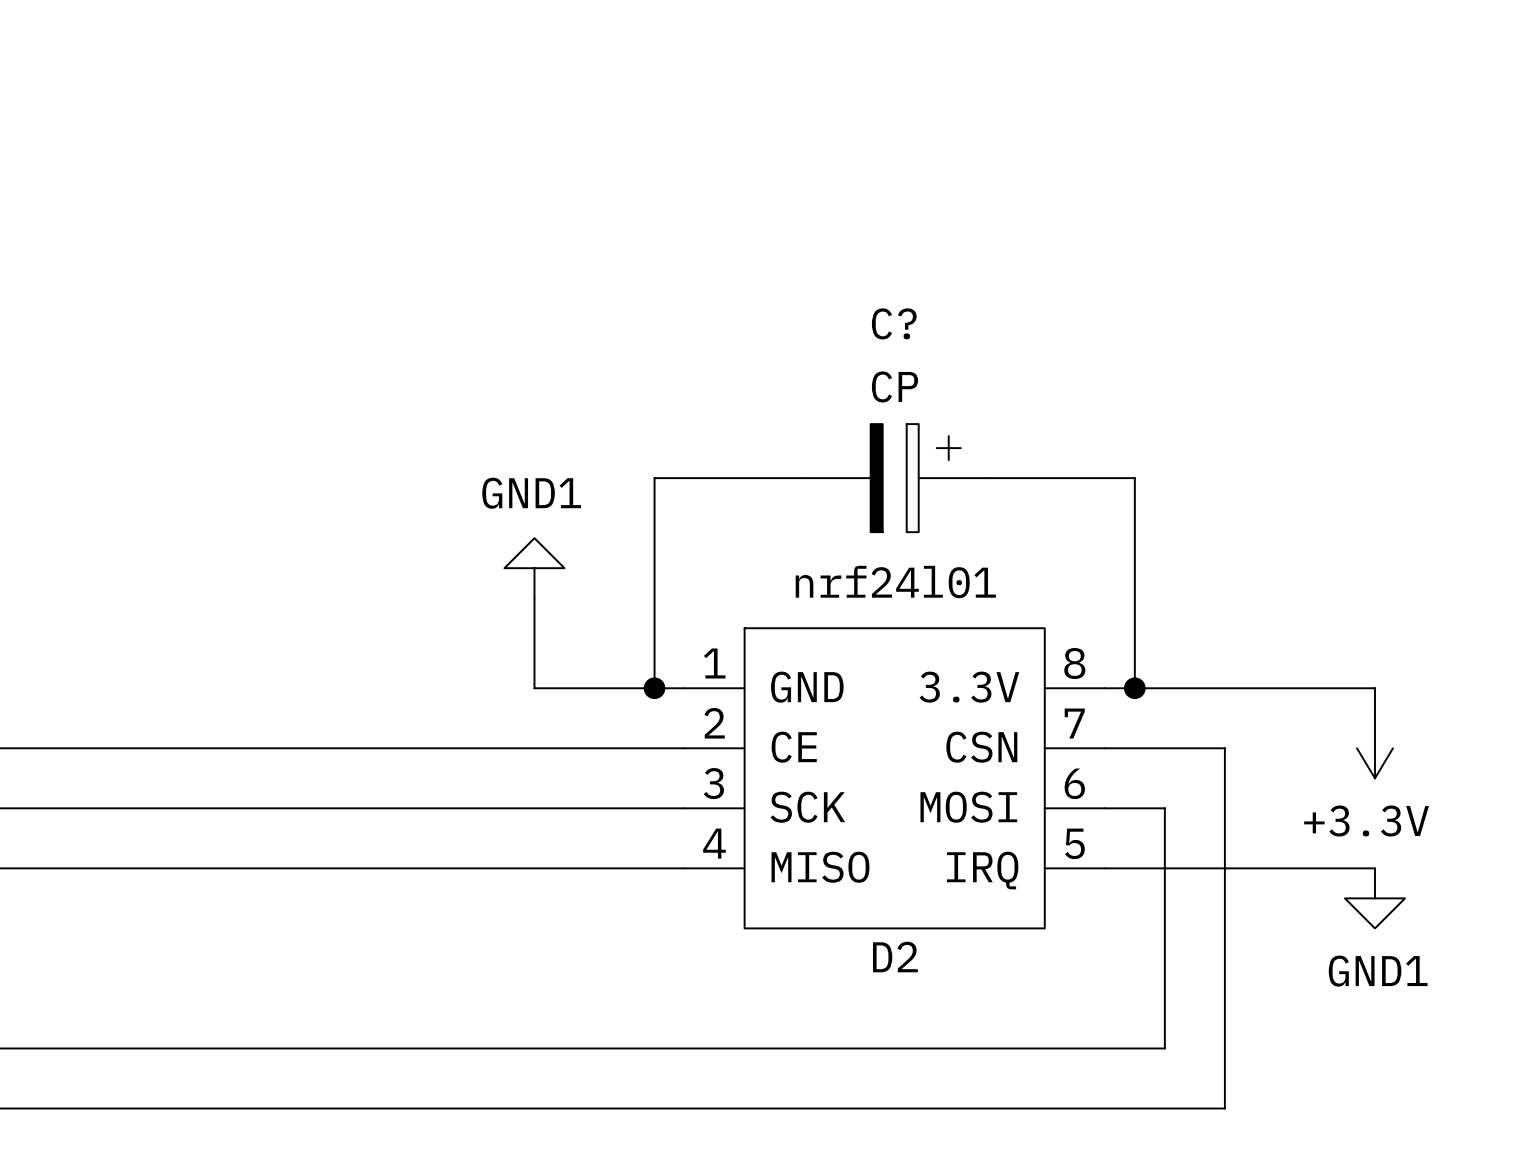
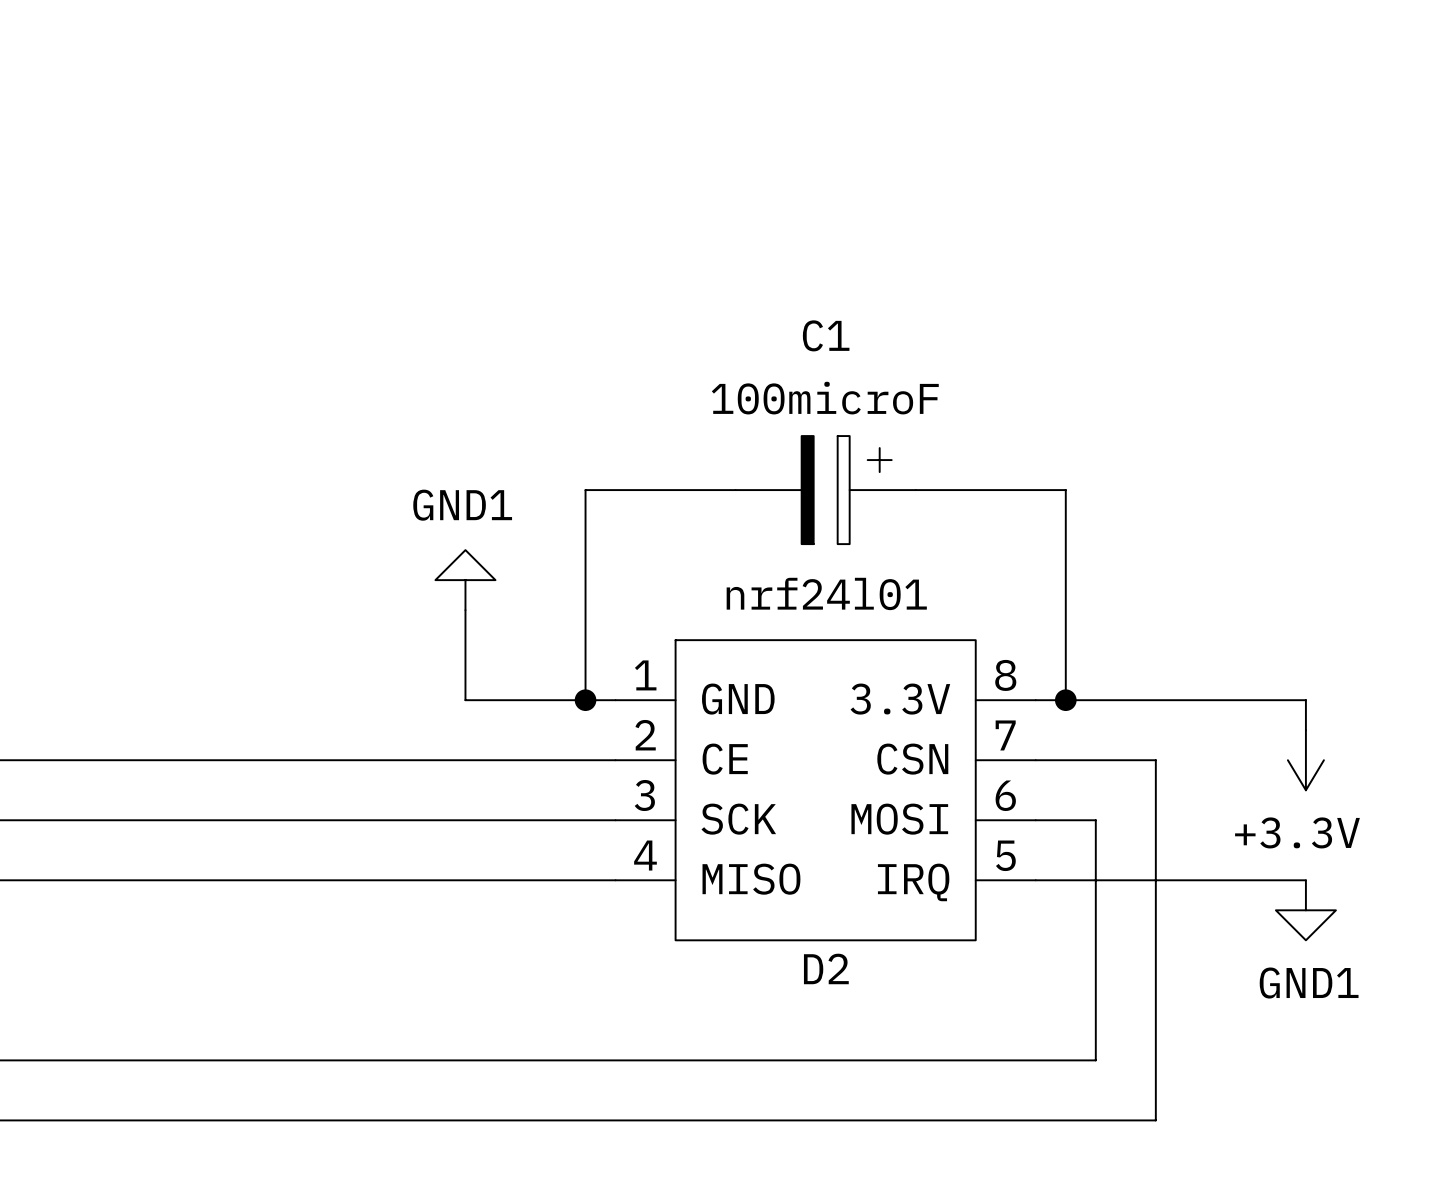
C? name: C? (894, 323) -> C1 (826, 335)
C? value: CP (894, 386) -> 100microF (825, 398)

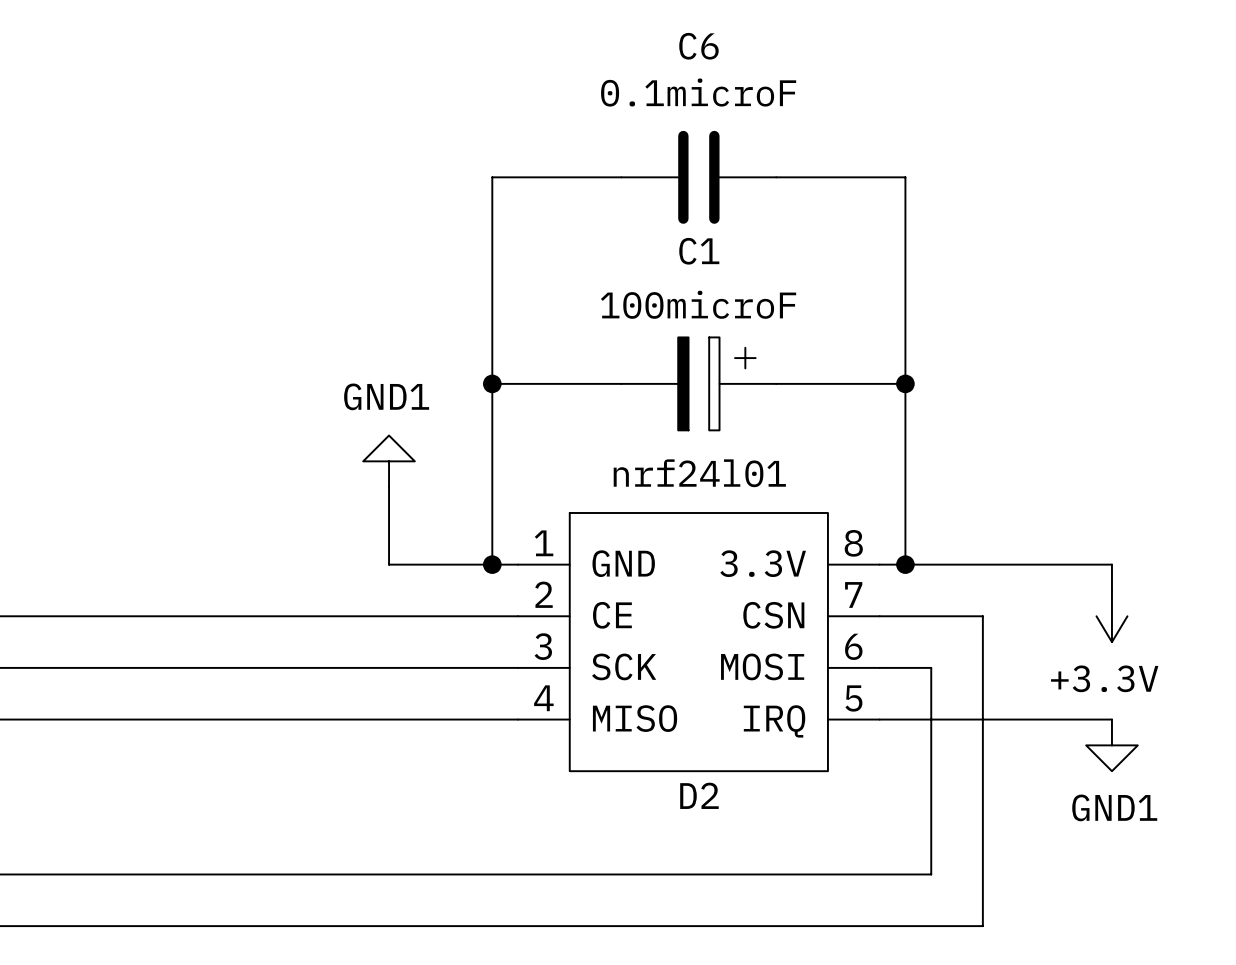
wire: none -> (621, 177) (492, 177) (492, 383)
C6: none -> 0.1microF (698, 177)
wire: none -> (776, 177) (905, 177) (905, 383)
junction: none -> (492, 383)
junction: none -> (905, 383)

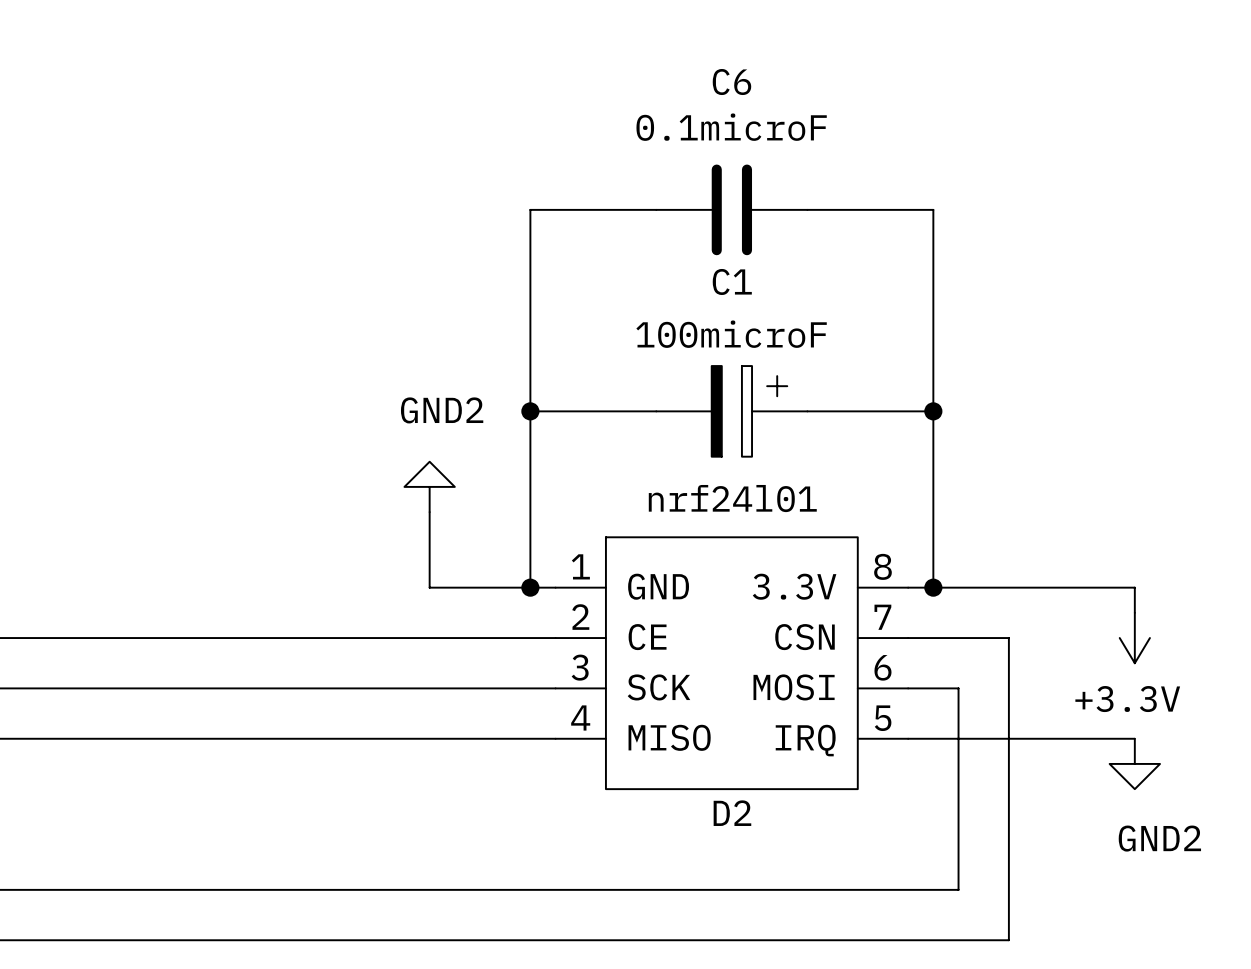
power symbol: GND1 (389, 461) -> GND2 (429, 486)
power symbol: GND1 (1111, 745) -> GND2 (1134, 763)

